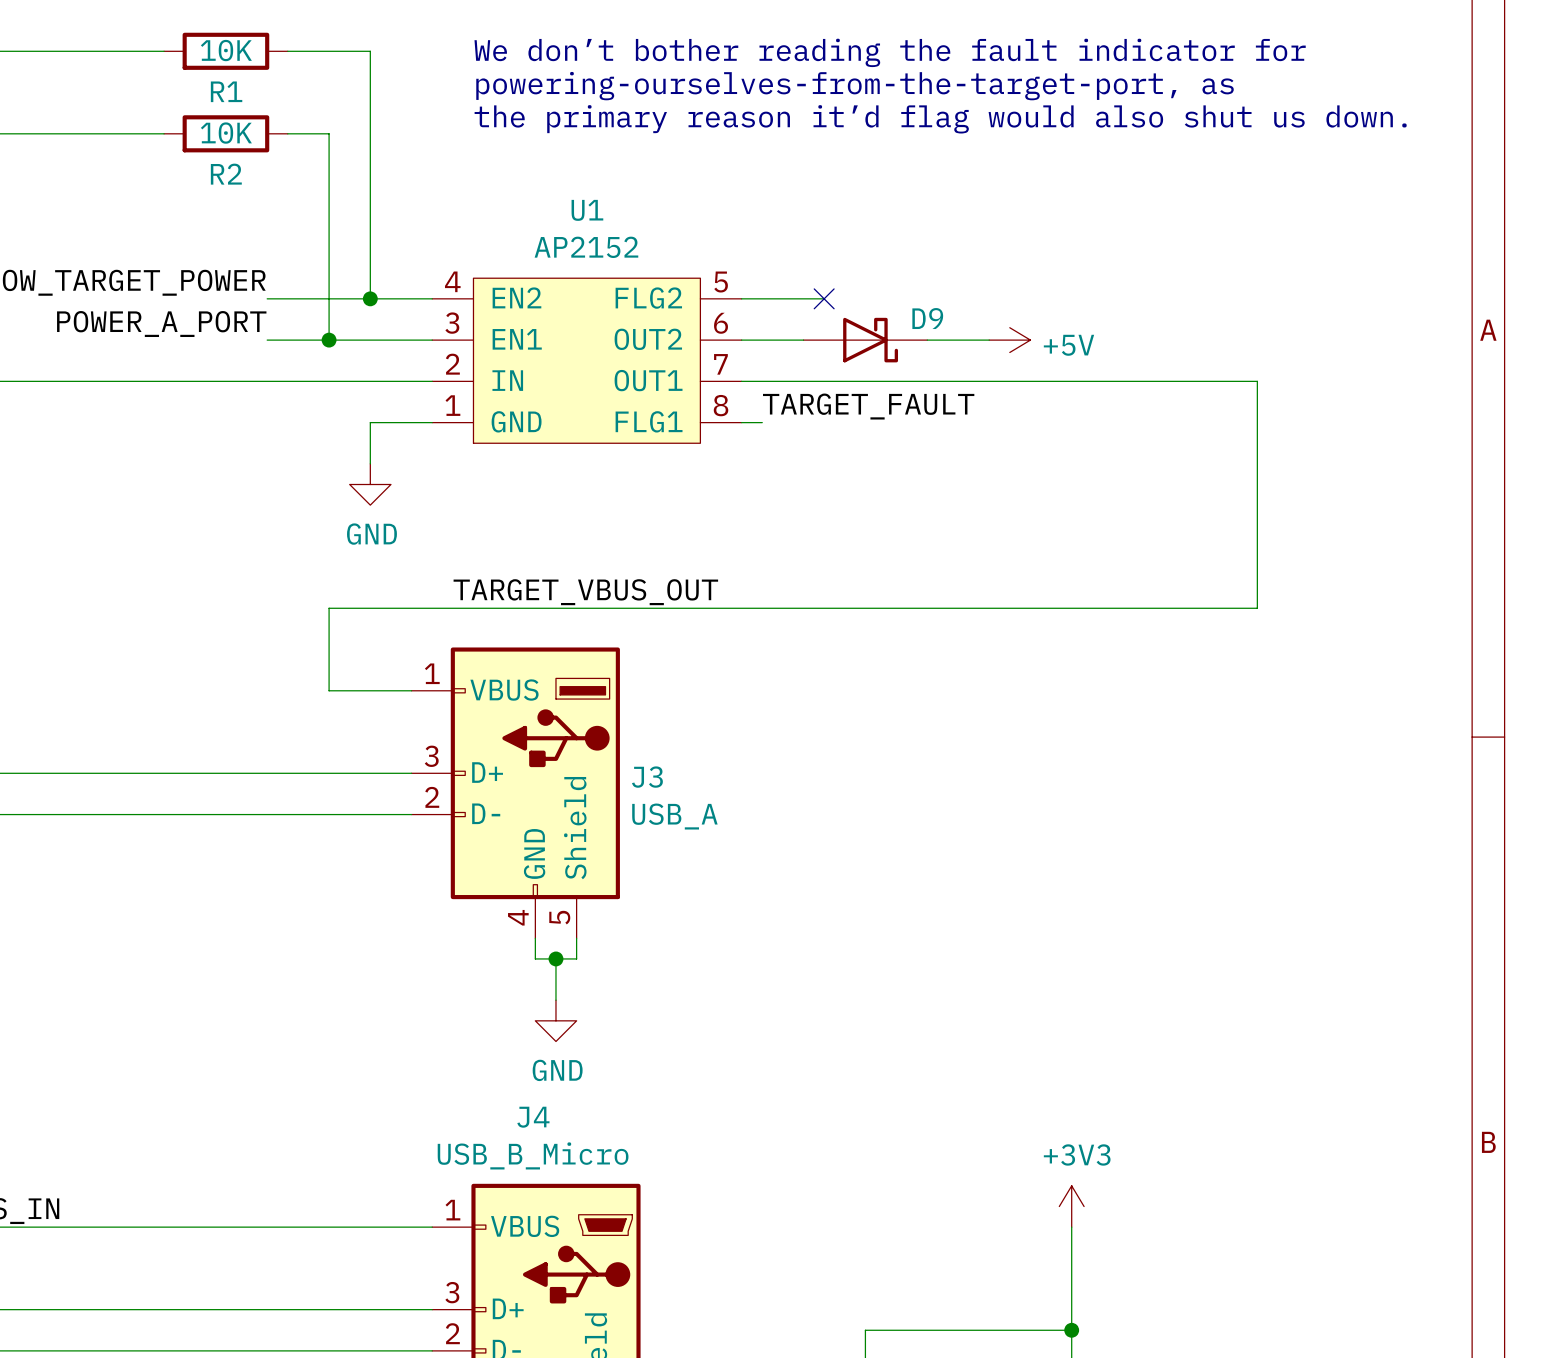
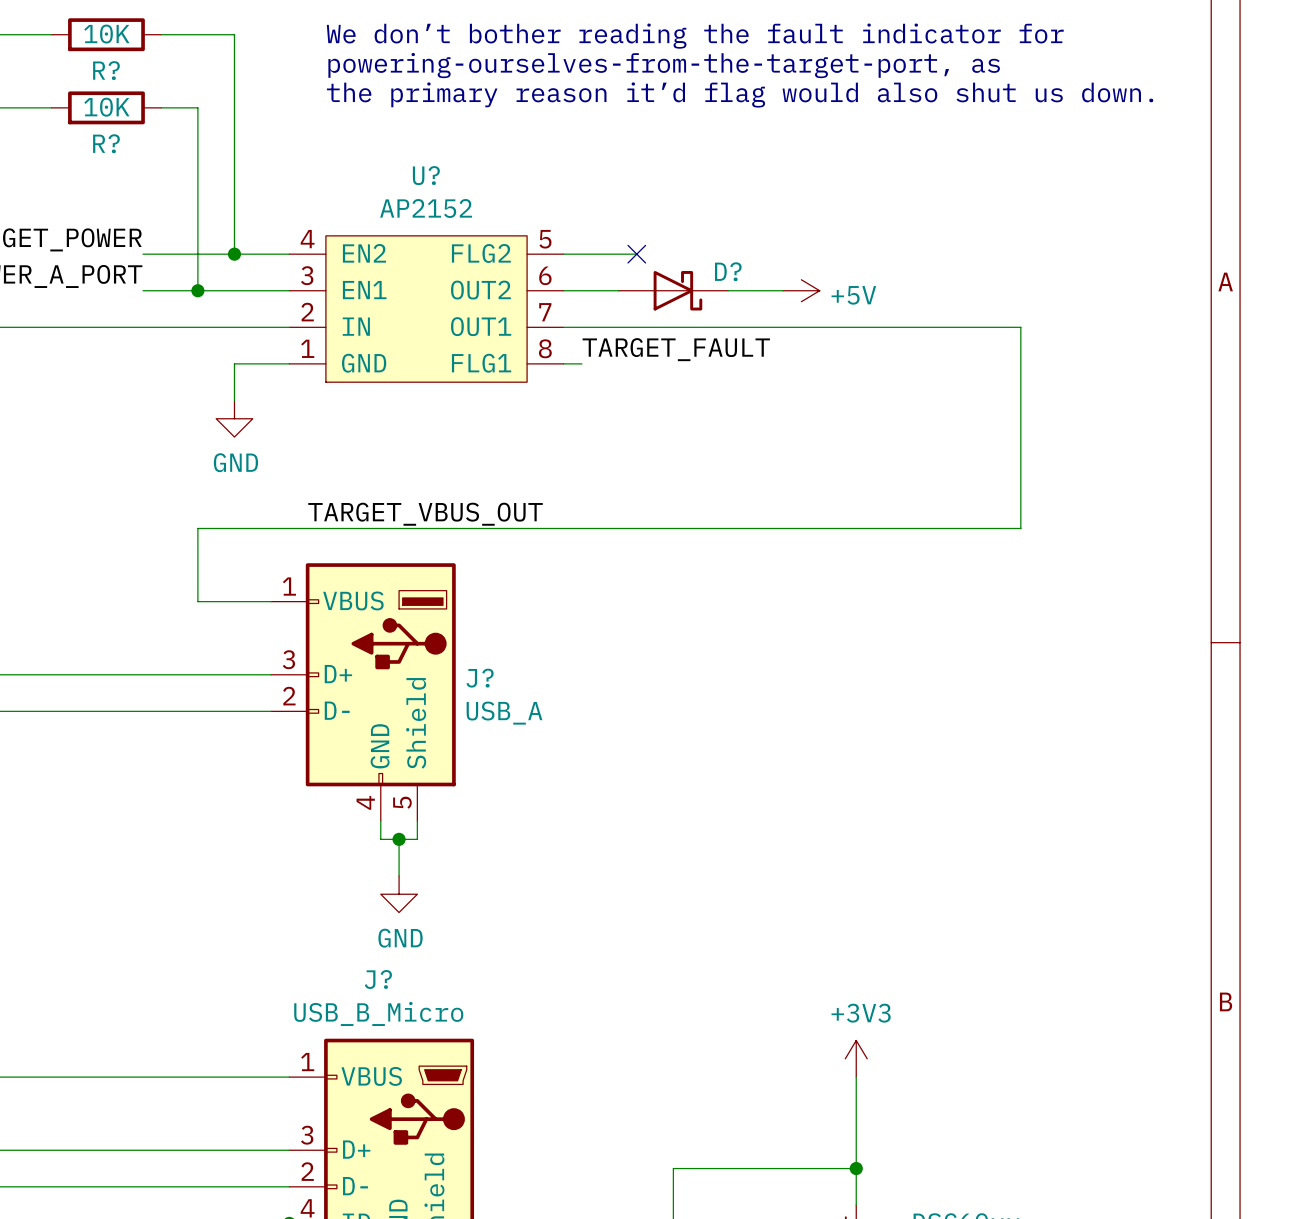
R1 name: R1 (226, 91) -> R? (106, 70)
R2 name: R2 (226, 174) -> R? (106, 143)
U1 name: U1 (587, 210) -> U? (426, 175)
D9 name: D9 (927, 318) -> D? (728, 271)
J3 name: J3 (647, 777) -> J? (480, 678)
J4 name: J4 (533, 1117) -> J? (378, 979)

